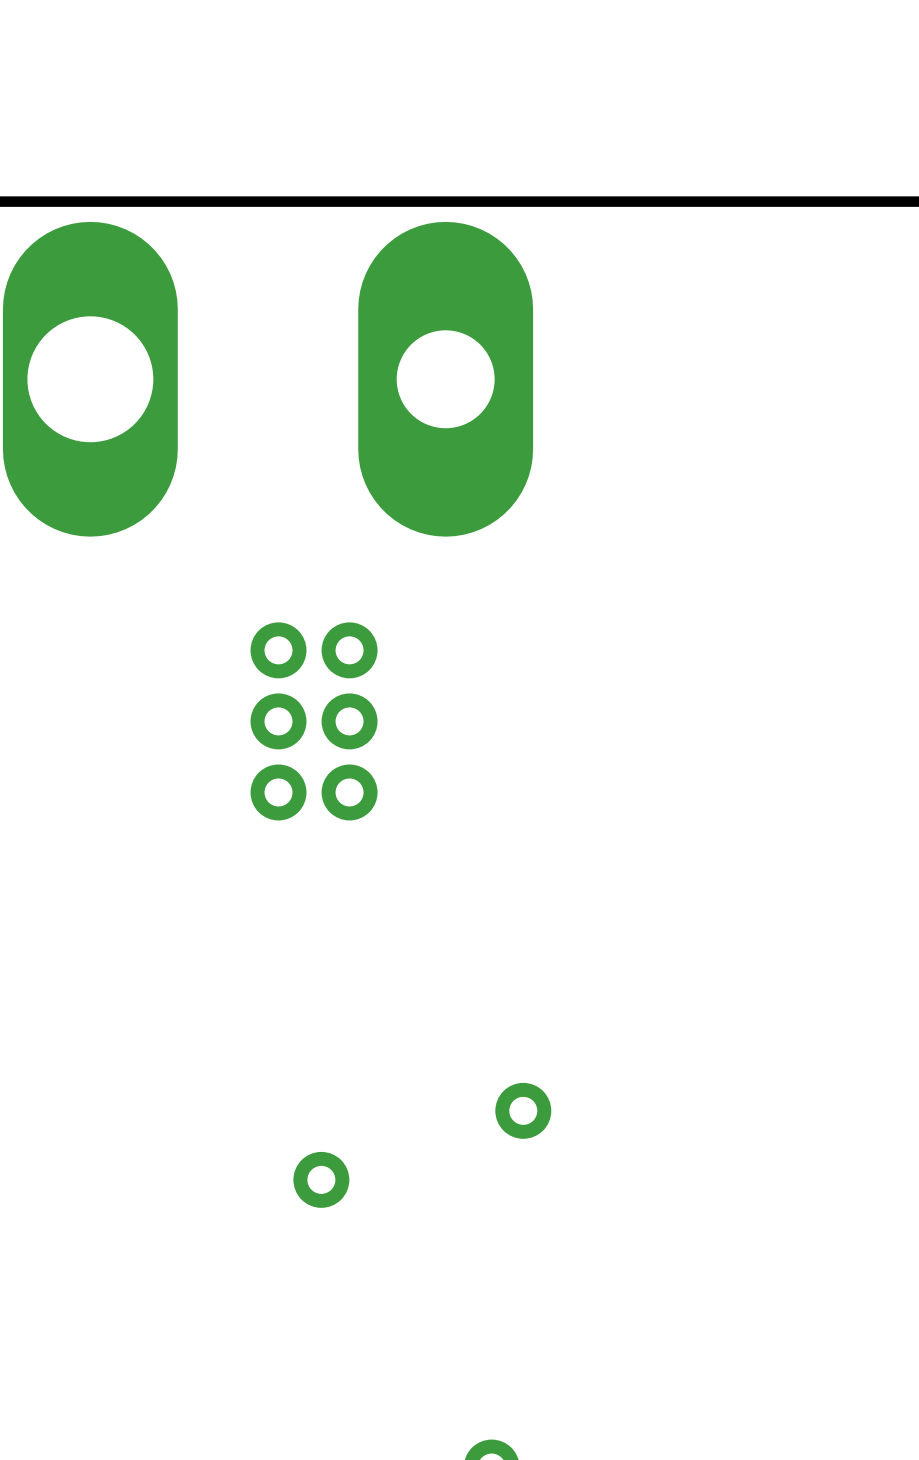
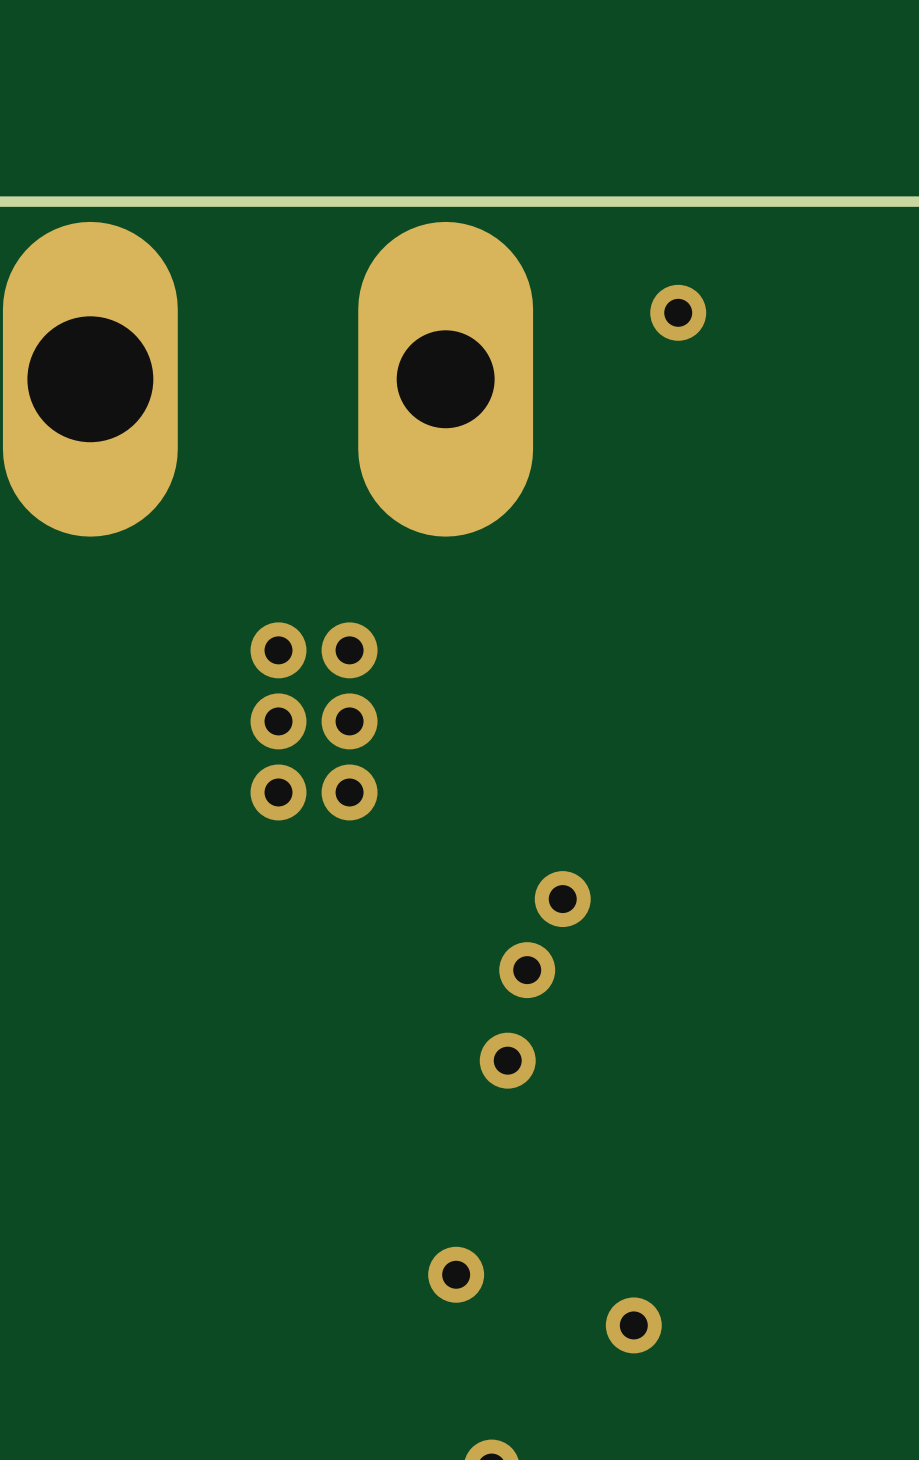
via: none -> (678, 312)
via: none -> (562, 899)
via: none -> (527, 970)
via position: (523, 1110) -> (507, 1060)
via: (321, 1179) -> none
via: none -> (456, 1274)
via: none -> (633, 1325)

